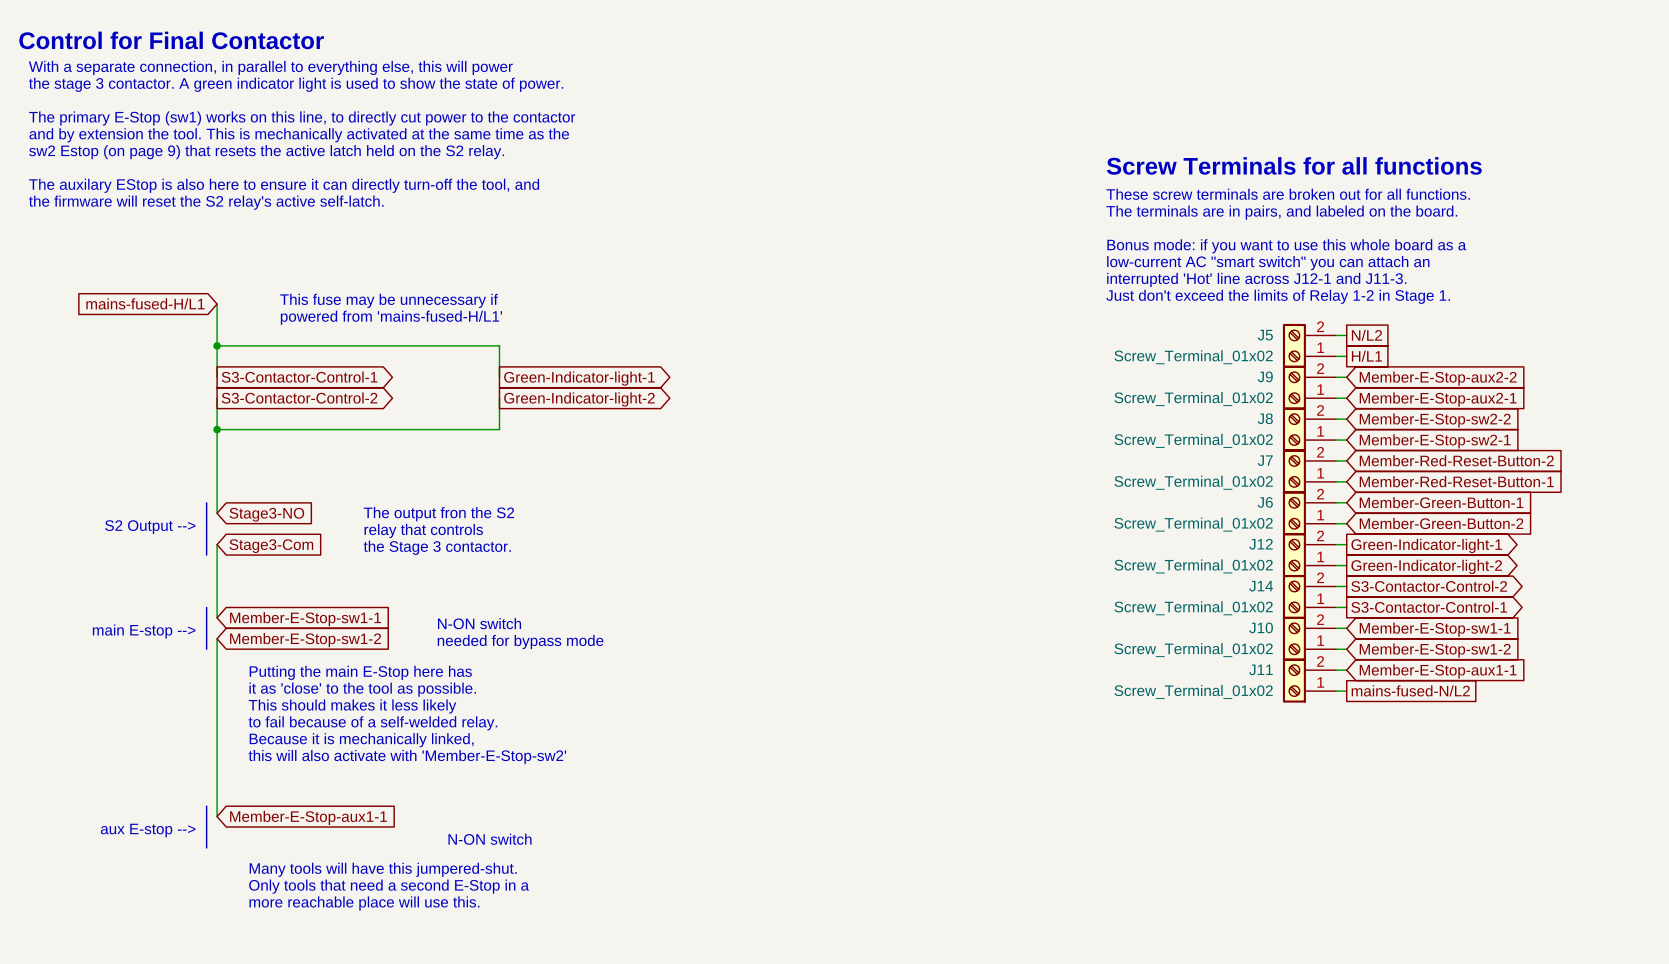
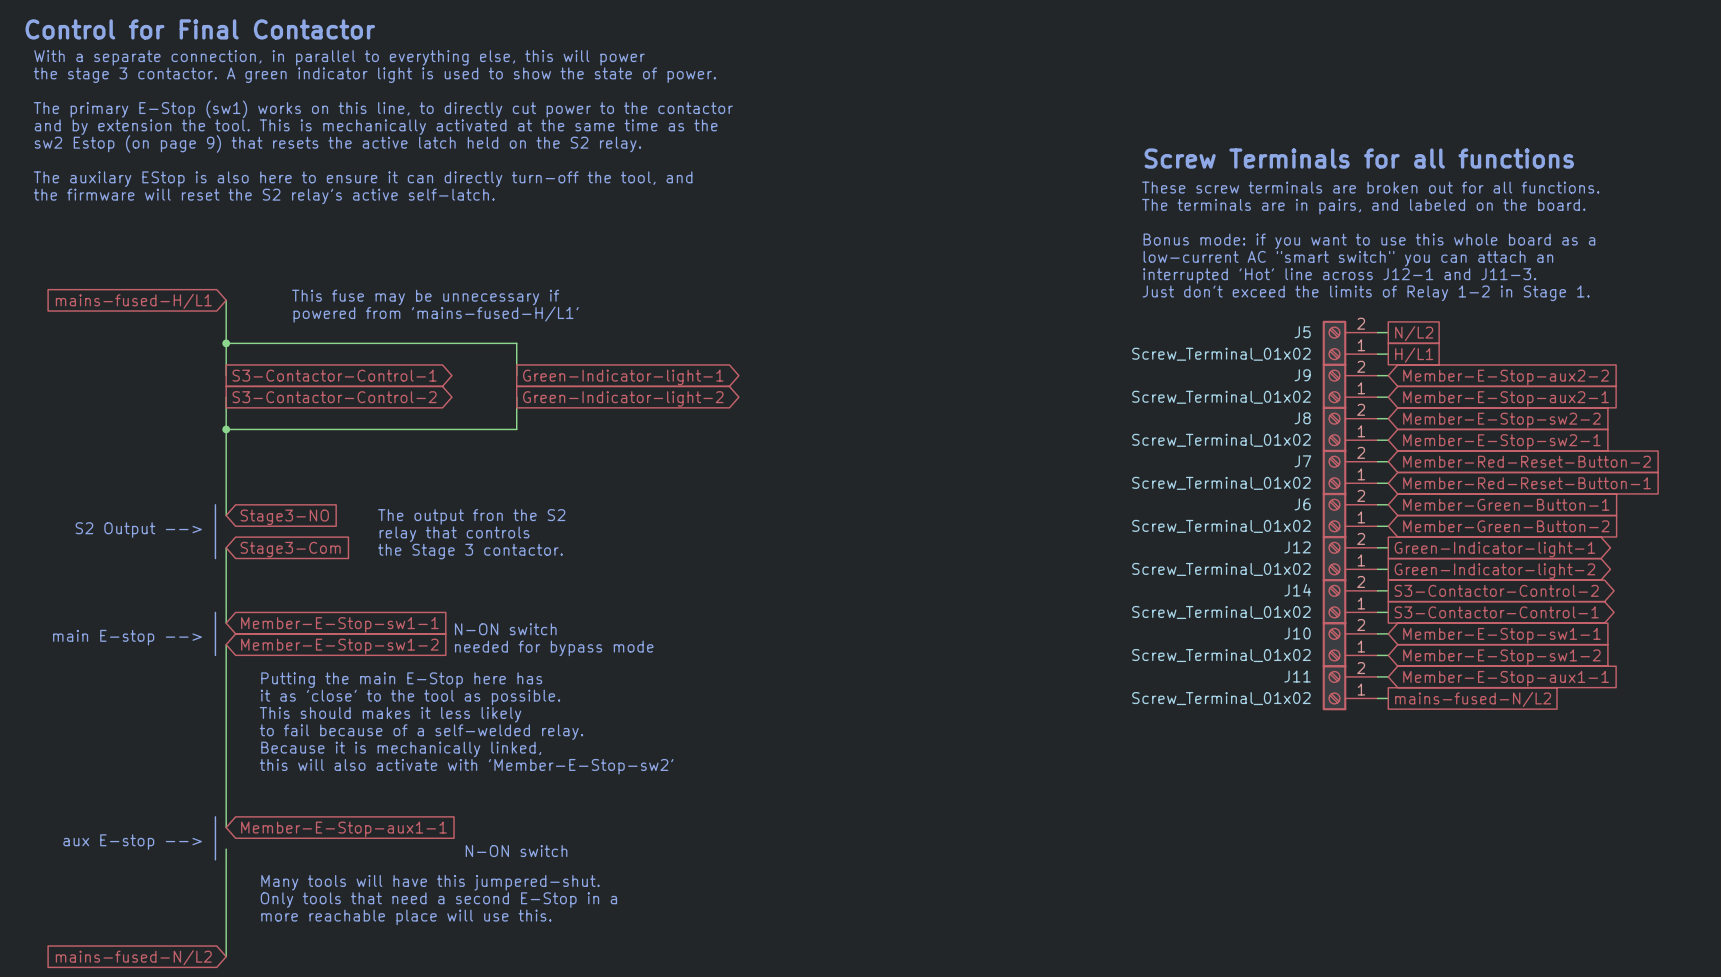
wire: none -> (226, 849) (226, 956)
global label: none -> mains-fused-N/L2 (133, 957)

